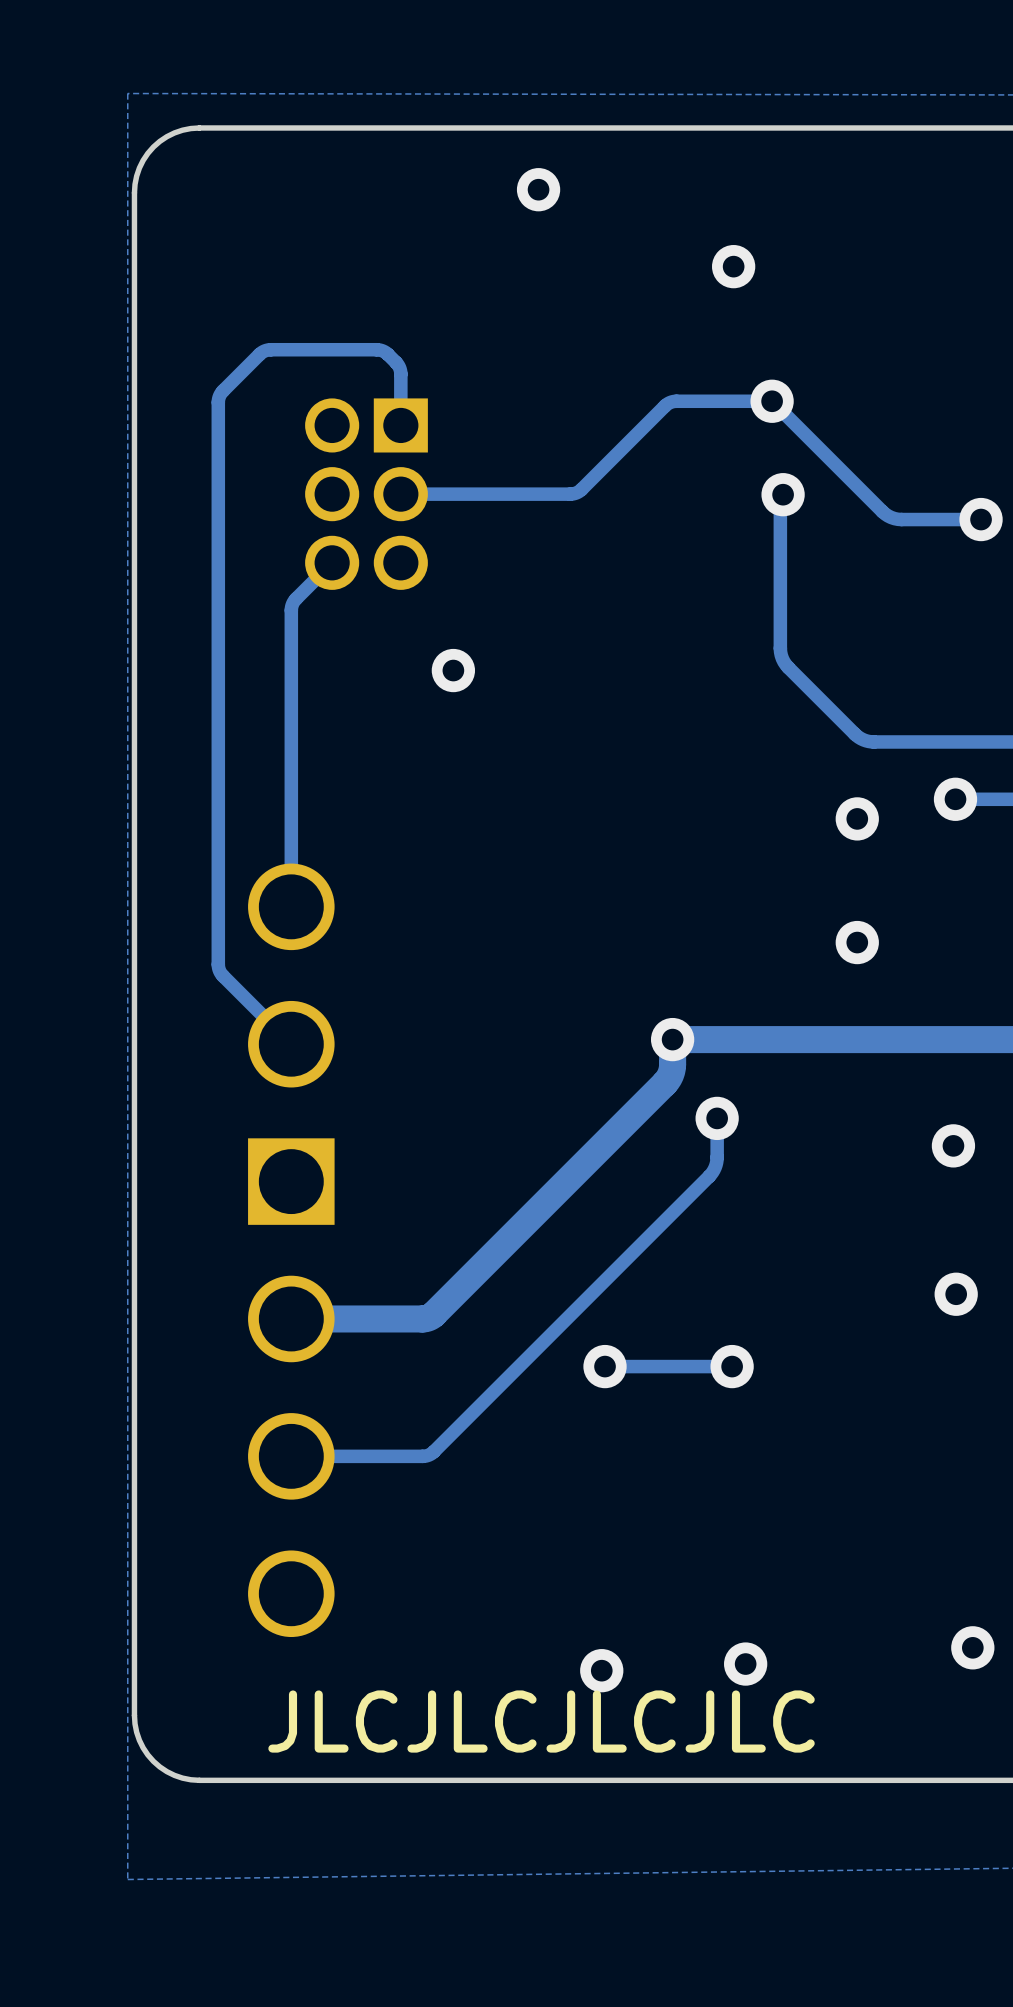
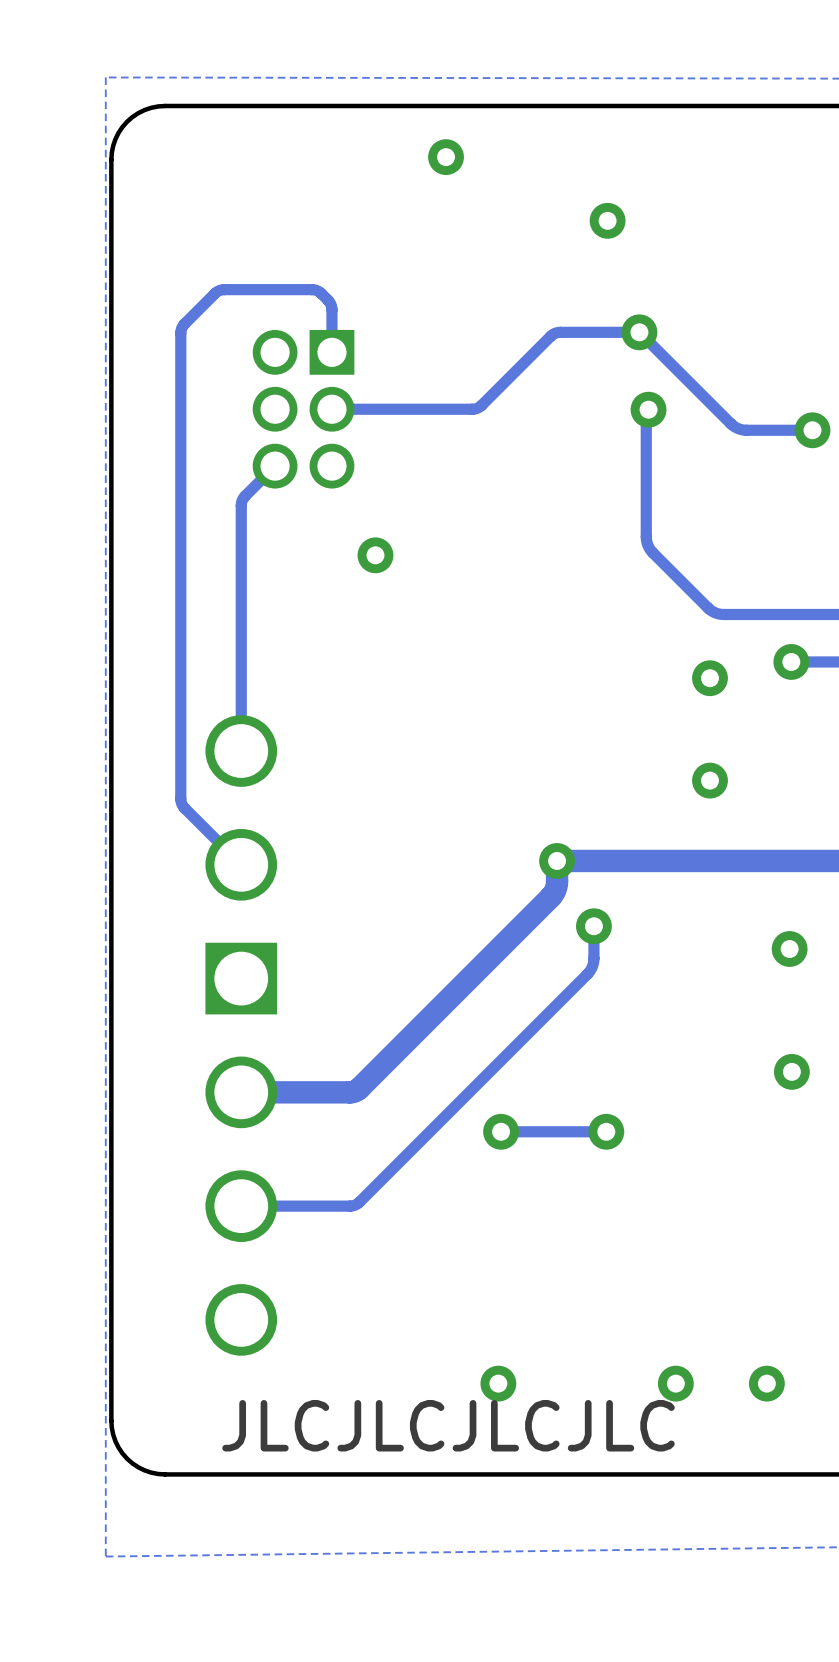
via position: (972, 1647) -> (766, 1383)
via position: (745, 1664) -> (675, 1383)

